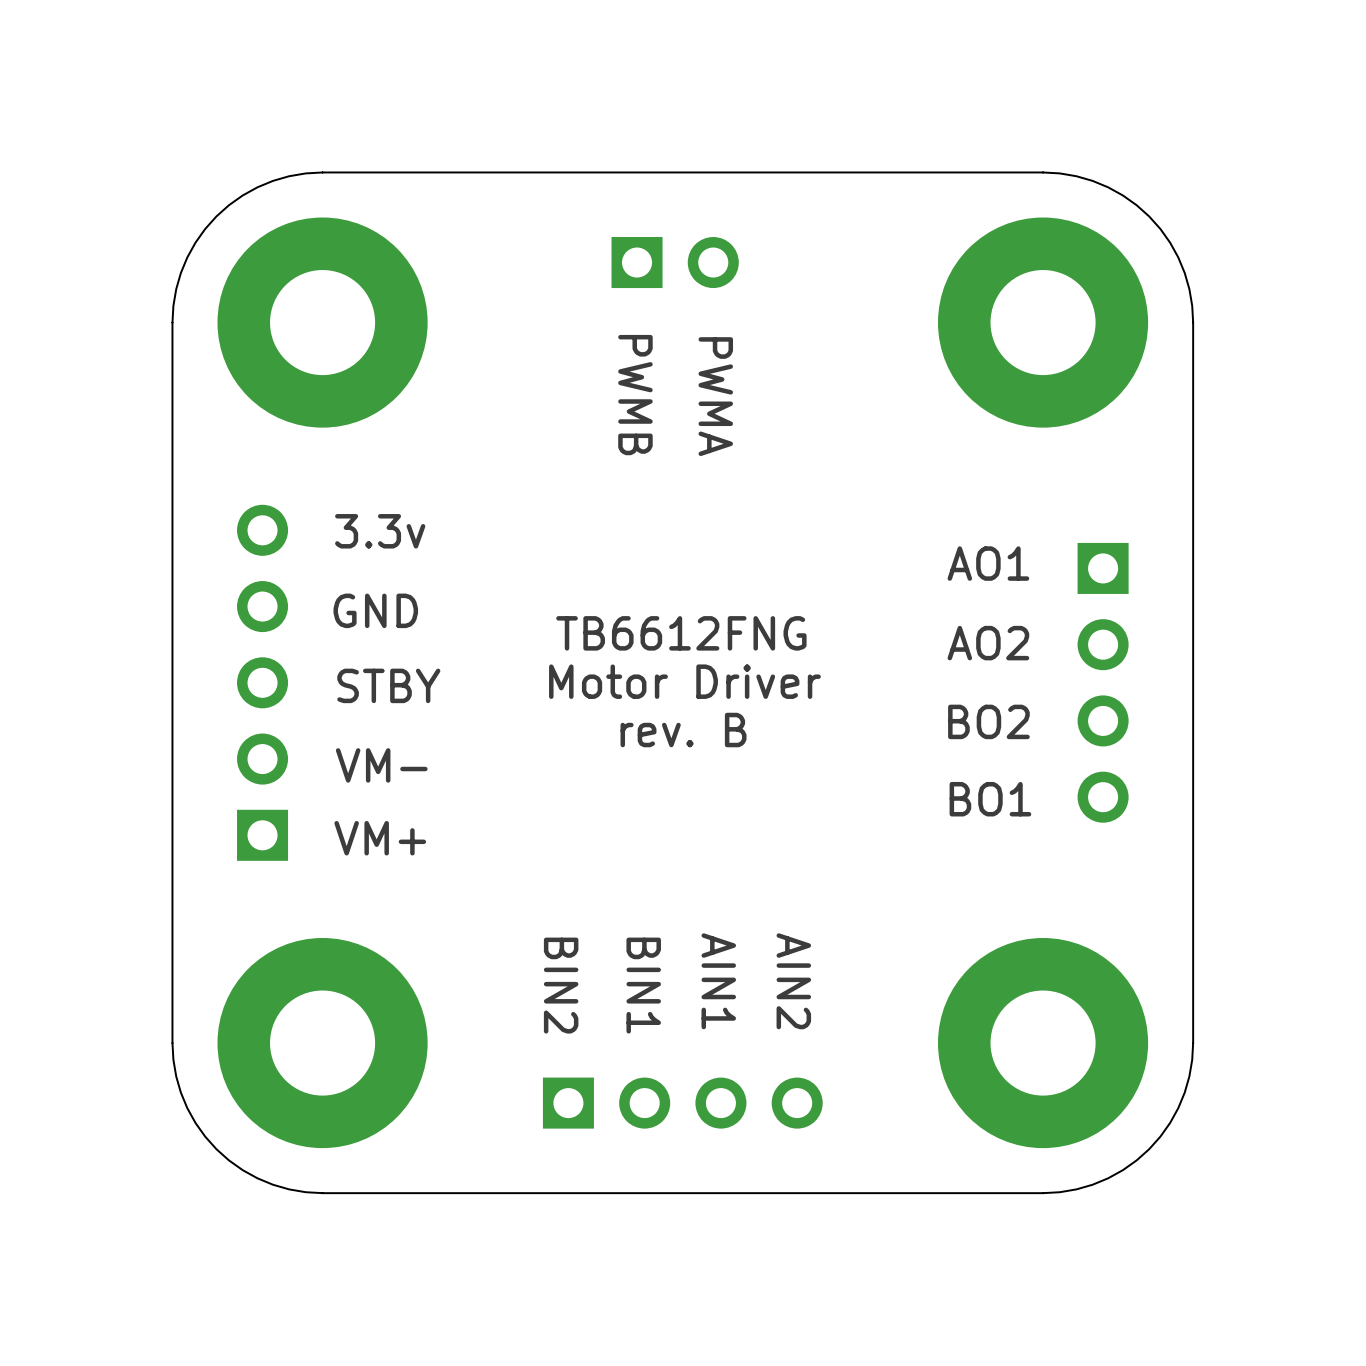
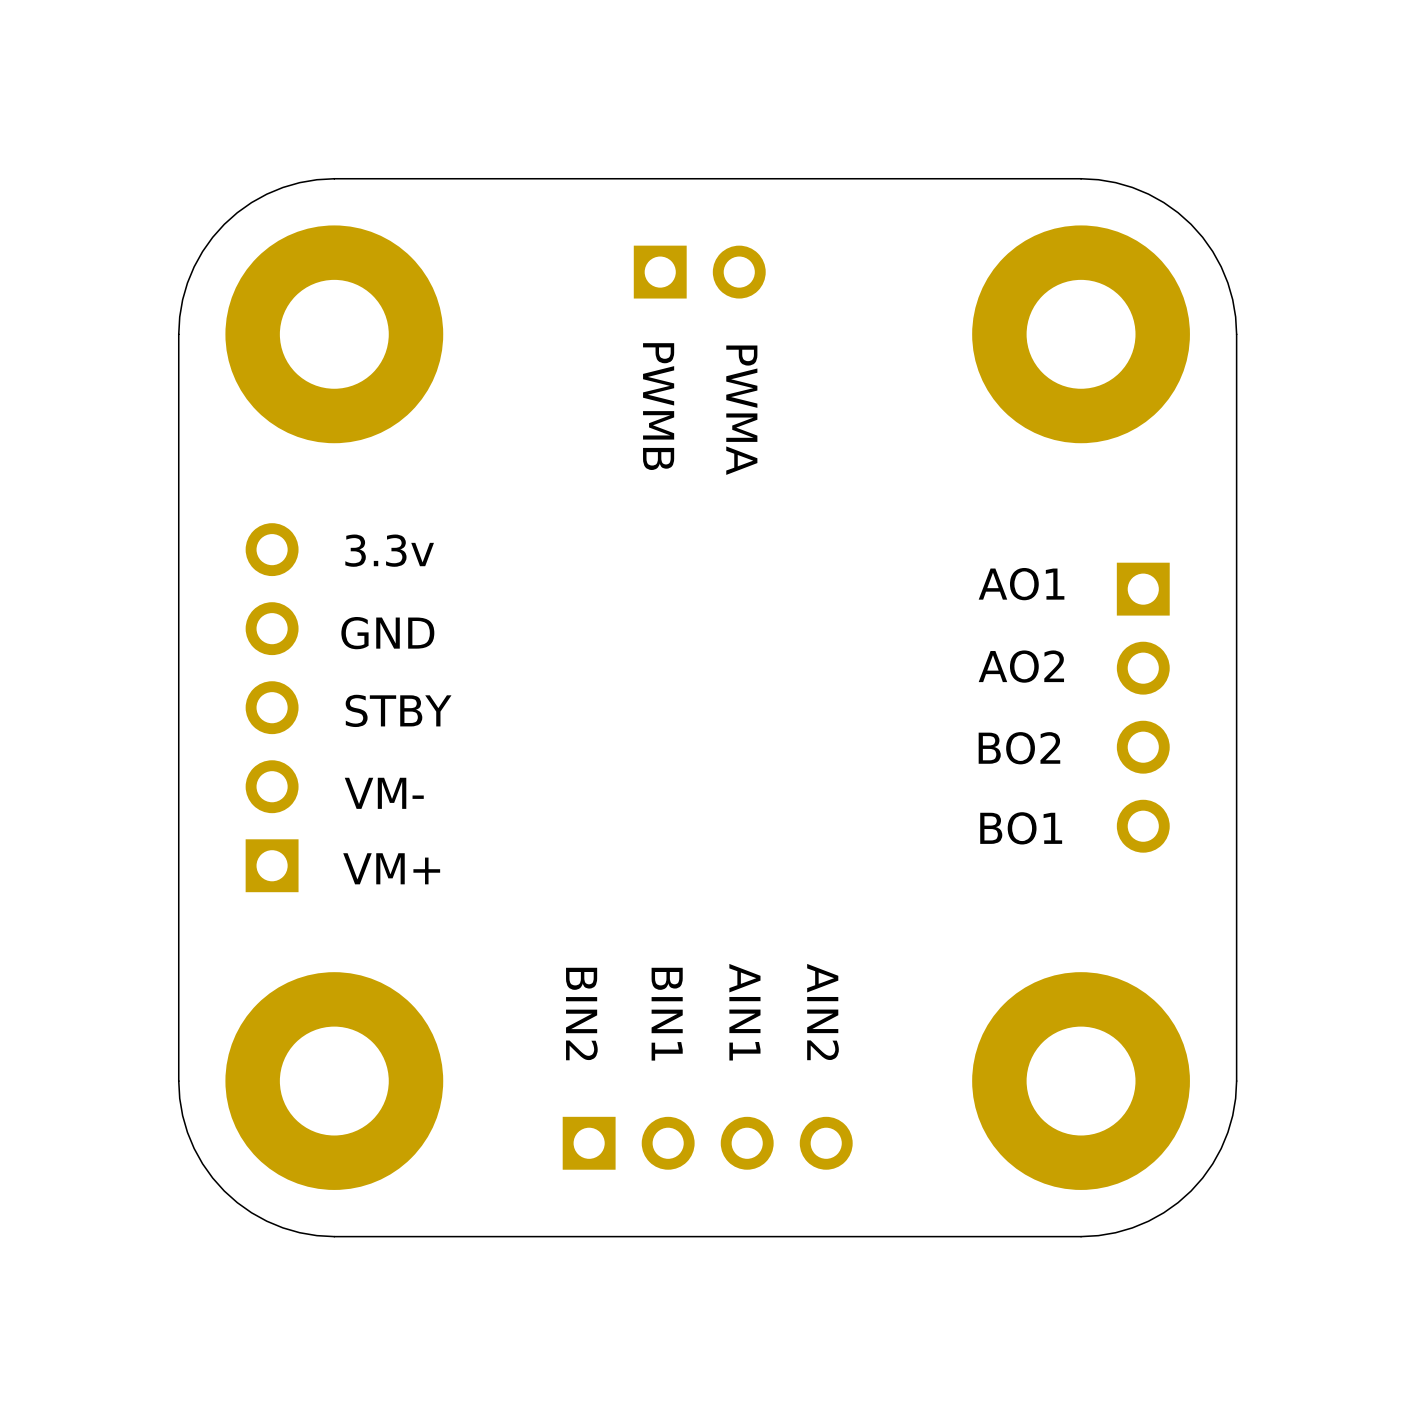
text: TB6612FNG (681, 633) -> none
text: Motor Driver (684, 681) -> none
text: rev. B (683, 730) -> none

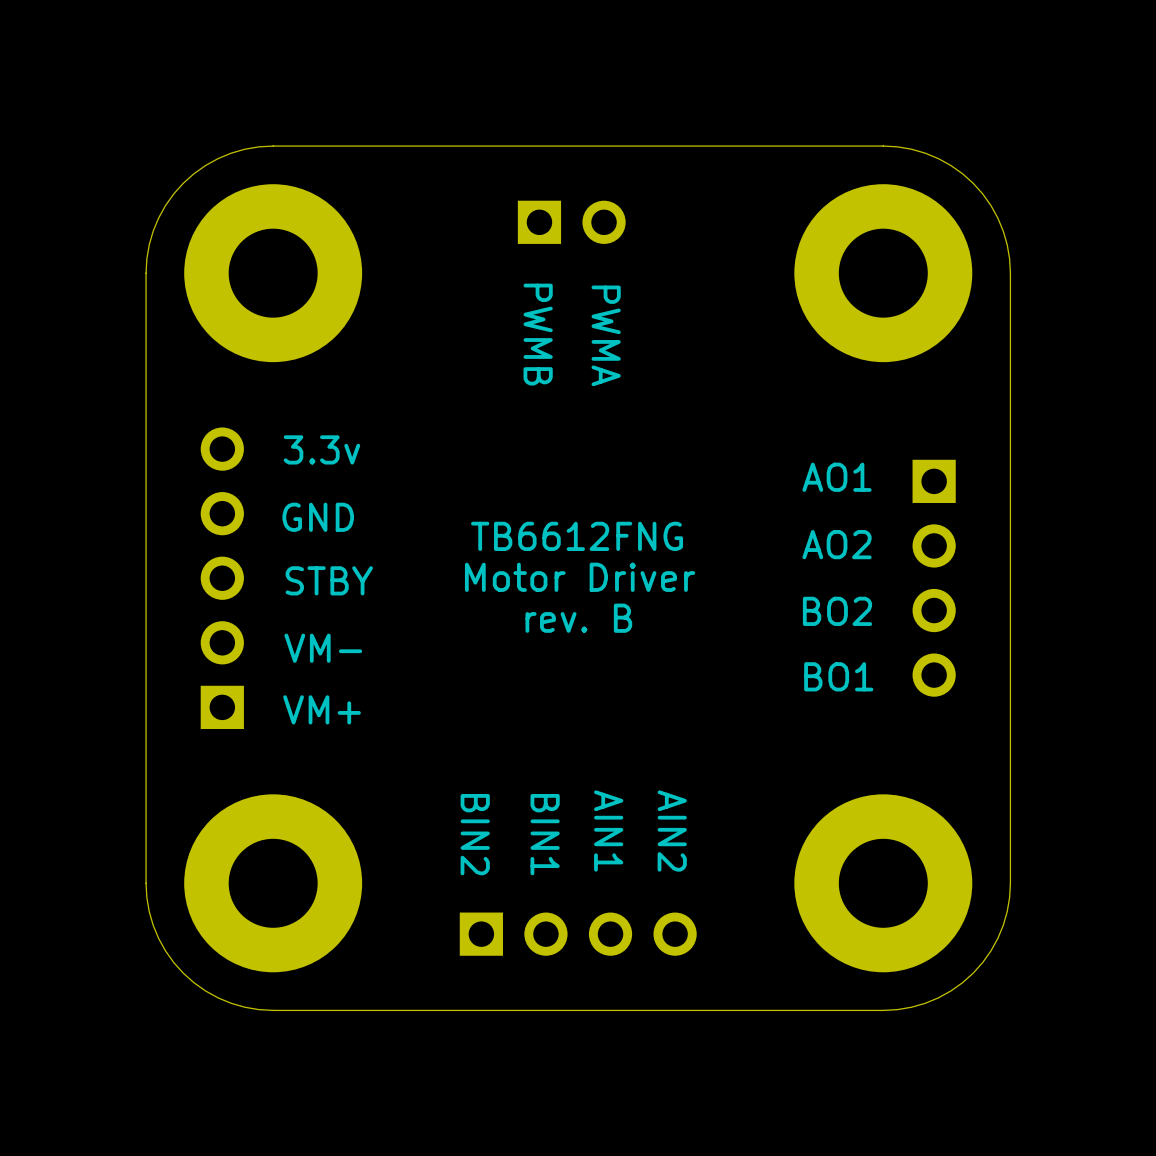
text: none -> TB6612FNG (577, 536)
text: none -> Motor Driver (580, 577)
text: none -> rev. B (578, 618)

